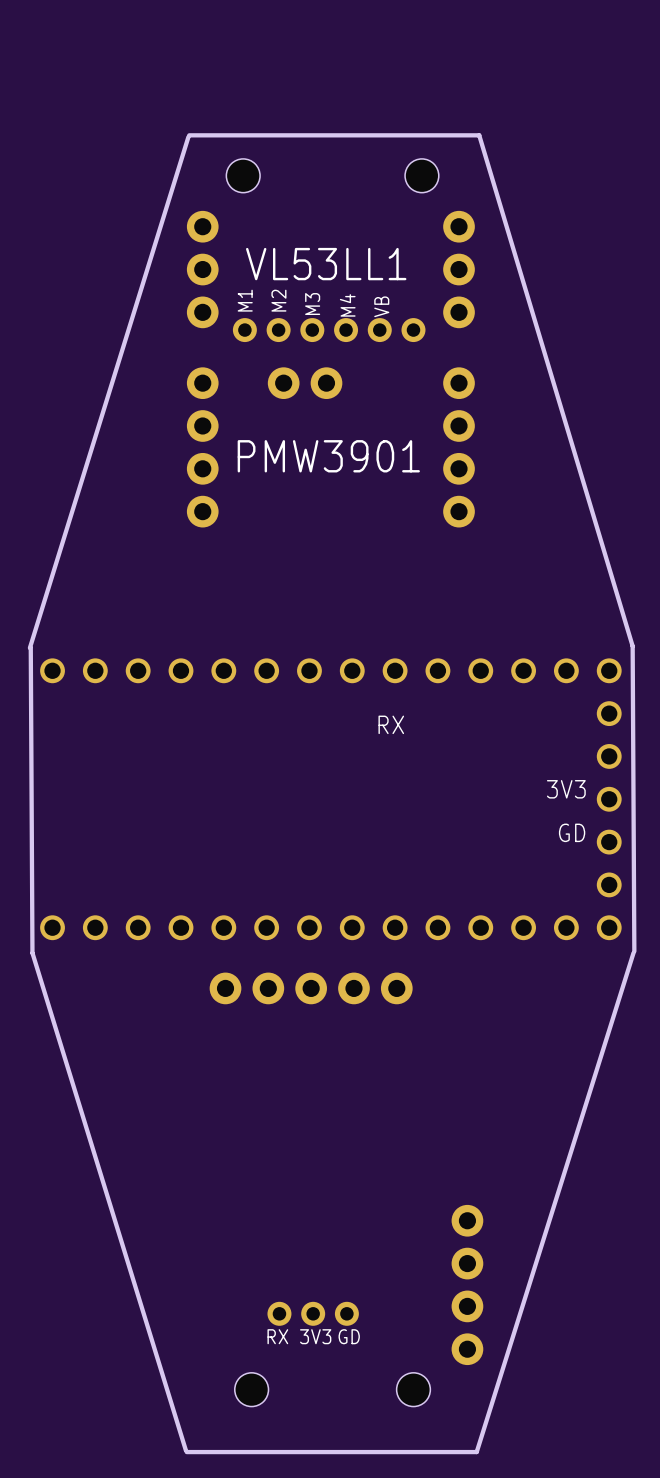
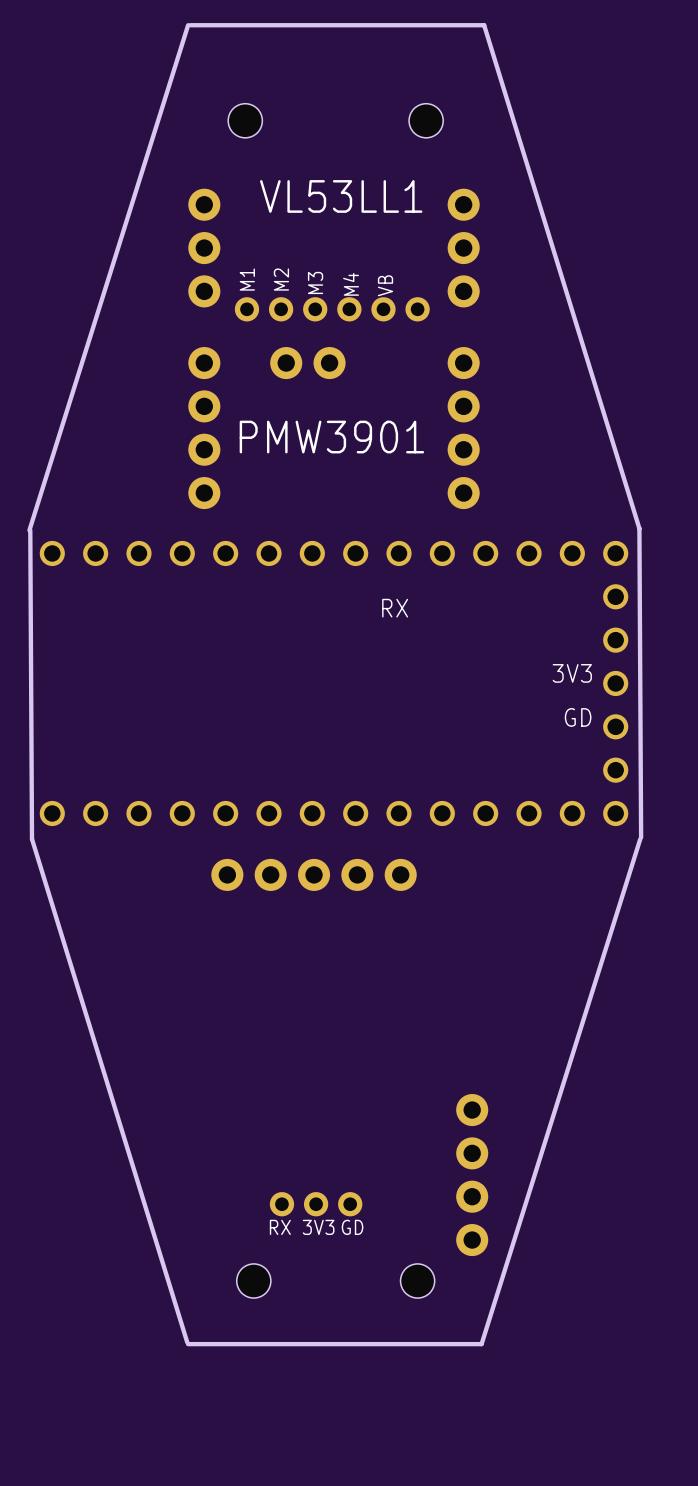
board edge: none -> (188, 25) (29, 530)
board edge: none -> (190, 25) (484, 25) (639, 528) (641, 837)
board edge: (189, 135) (479, 135) (632, 646) (634, 951) -> none
board edge: (188, 137) (29, 647) -> none
hole position: (243, 175) -> (245, 120)
hole position: (421, 175) -> (426, 120)
text position: VL53LL1 (326, 264) -> VL53LL1 (341, 196)
board edge: (30, 647) (32, 953) (185, 1450) -> (30, 530) (32, 839) (187, 1342)
text position: RX (391, 724) -> RX (395, 608)
text position: 3V3 (566, 789) -> 3V3 (572, 673)
part position: (330, 799) -> (334, 683)
text position: GD (572, 832) -> GD (578, 717)
board edge: (633, 953) (476, 1452) (186, 1452) -> (640, 839) (481, 1344) (188, 1344)
part position: (311, 988) -> (314, 874)
part position: (467, 1284) -> (472, 1175)
hole: none -> (253, 1281)
hole: none -> (417, 1281)
part position: (313, 1313) -> (316, 1204)
text position: RX (277, 1336) -> RX (280, 1227)
text position: 3V3 (315, 1336) -> 3V3 (318, 1227)
text position: GD (349, 1336) -> GD (352, 1227)
hole: (251, 1389) -> none
hole: (413, 1389) -> none

